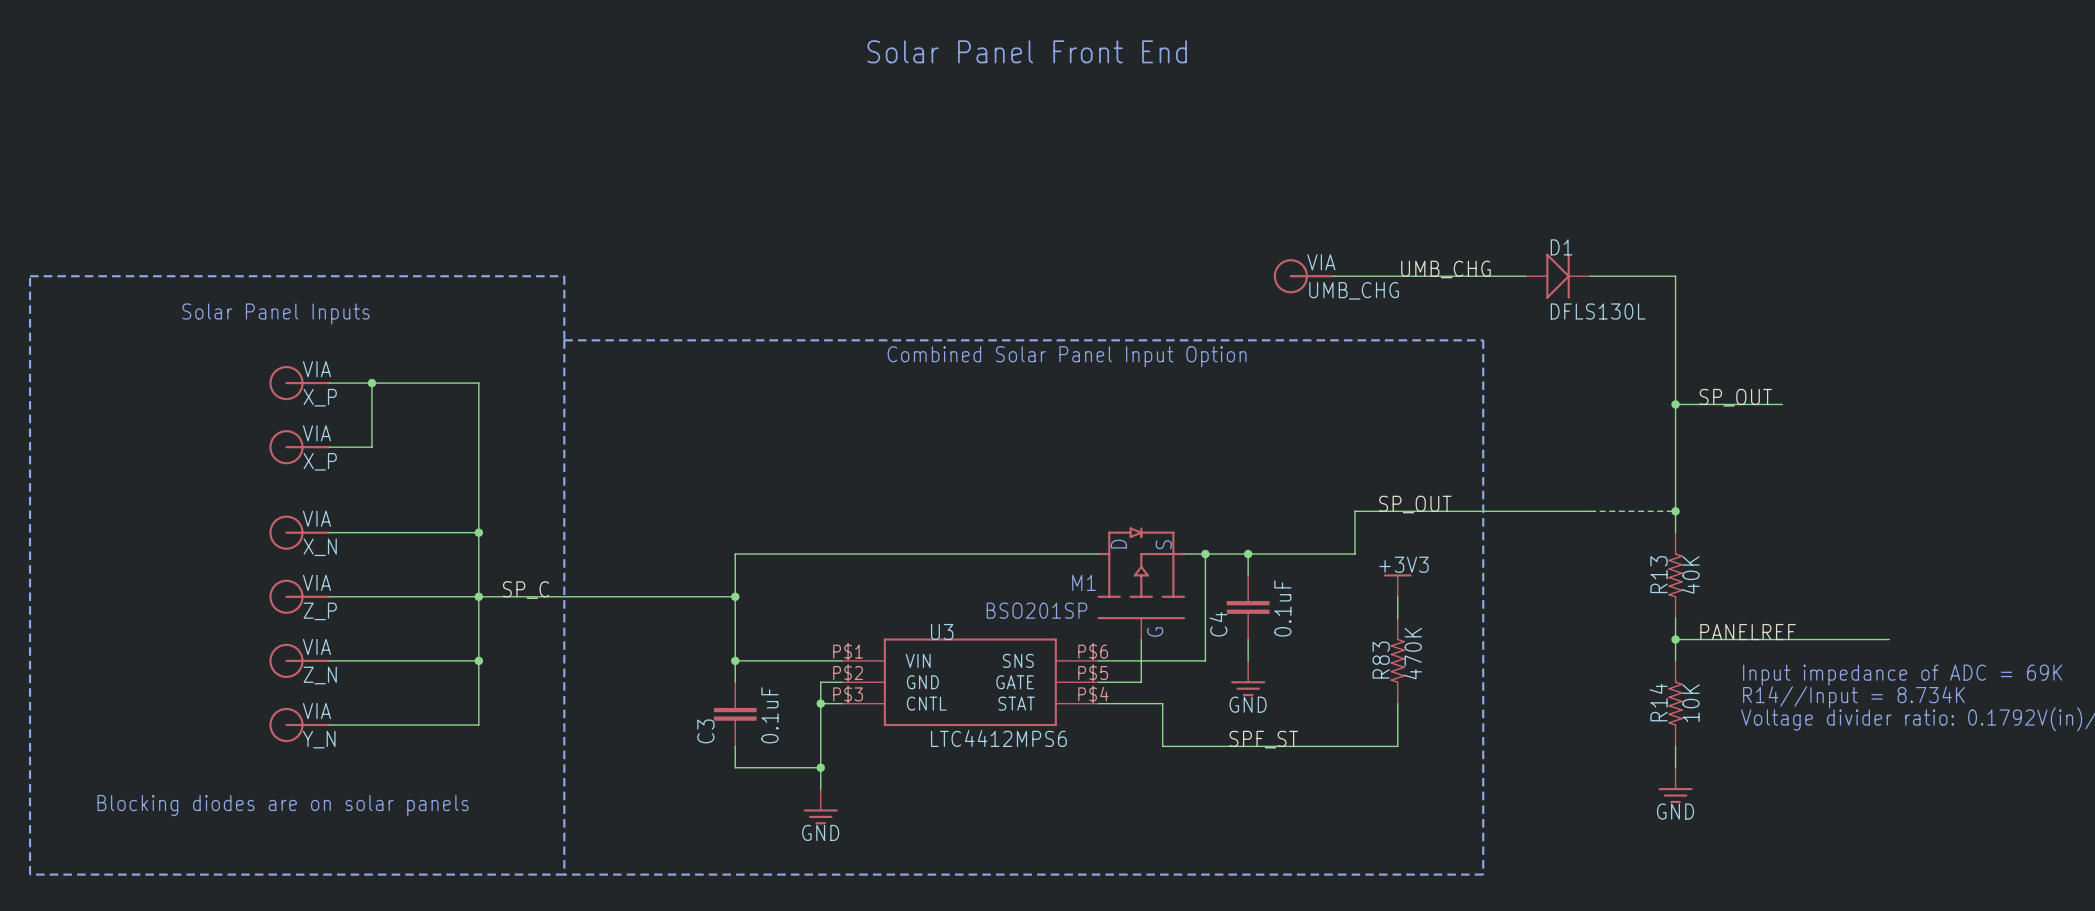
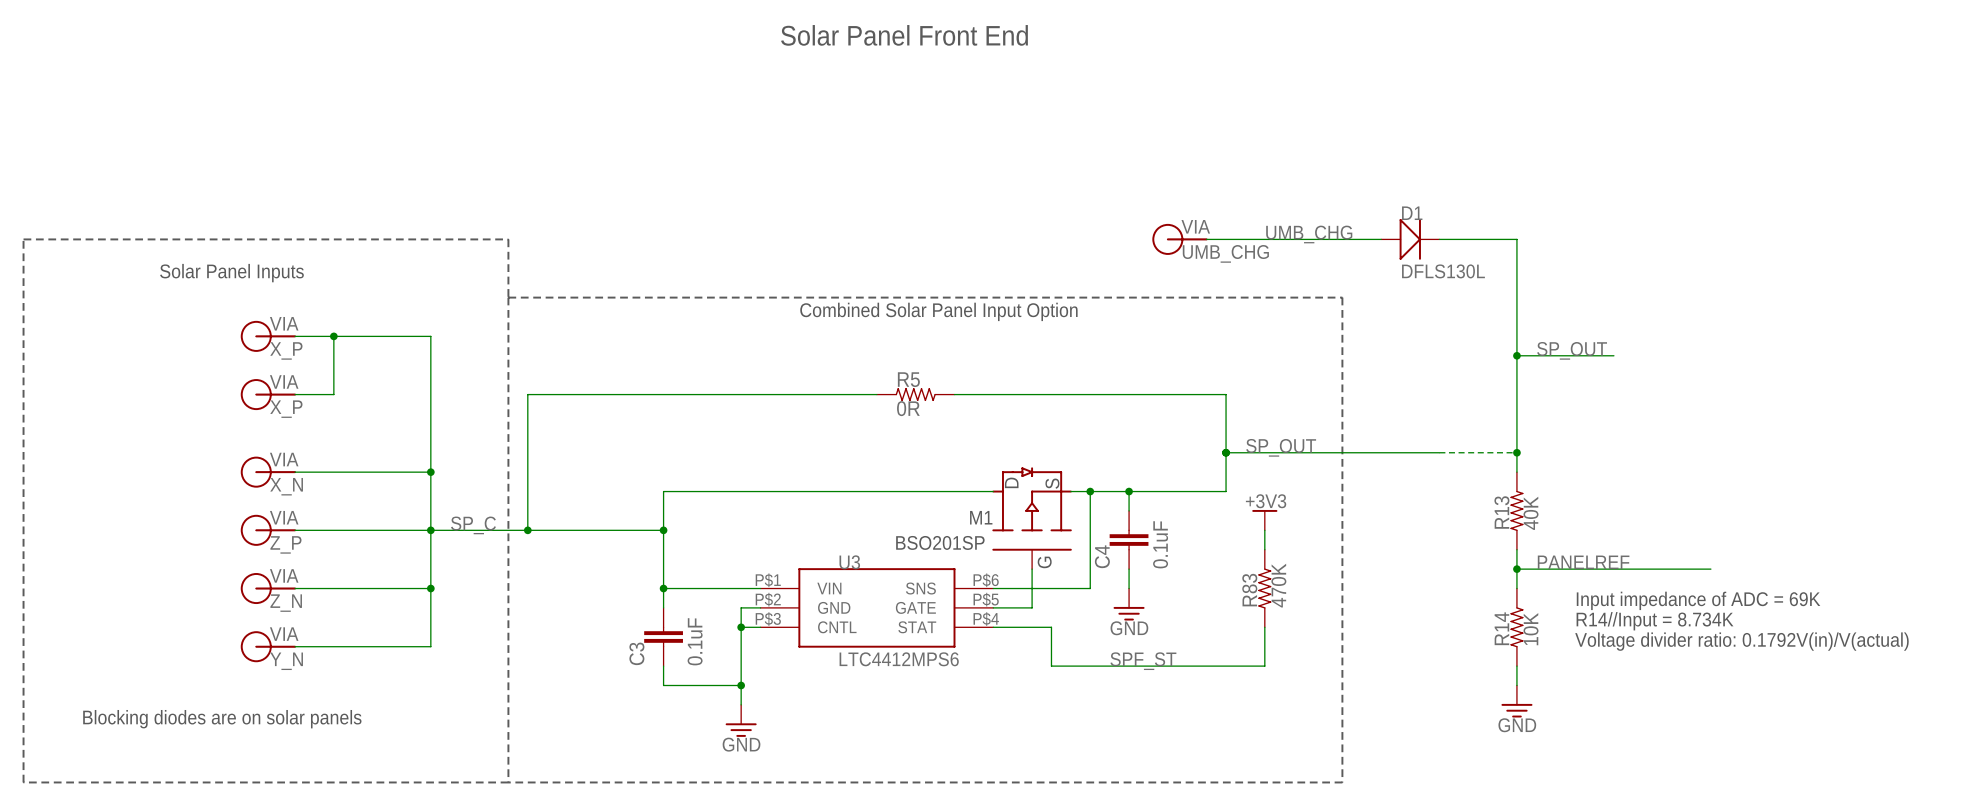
wire: none -> (876, 394) (527, 394) (527, 530)
R5: none -> 0R (915, 394)
wire: none -> (954, 394) (1226, 394) (1226, 452)
junction: none -> (1226, 452)
junction: none -> (527, 530)

